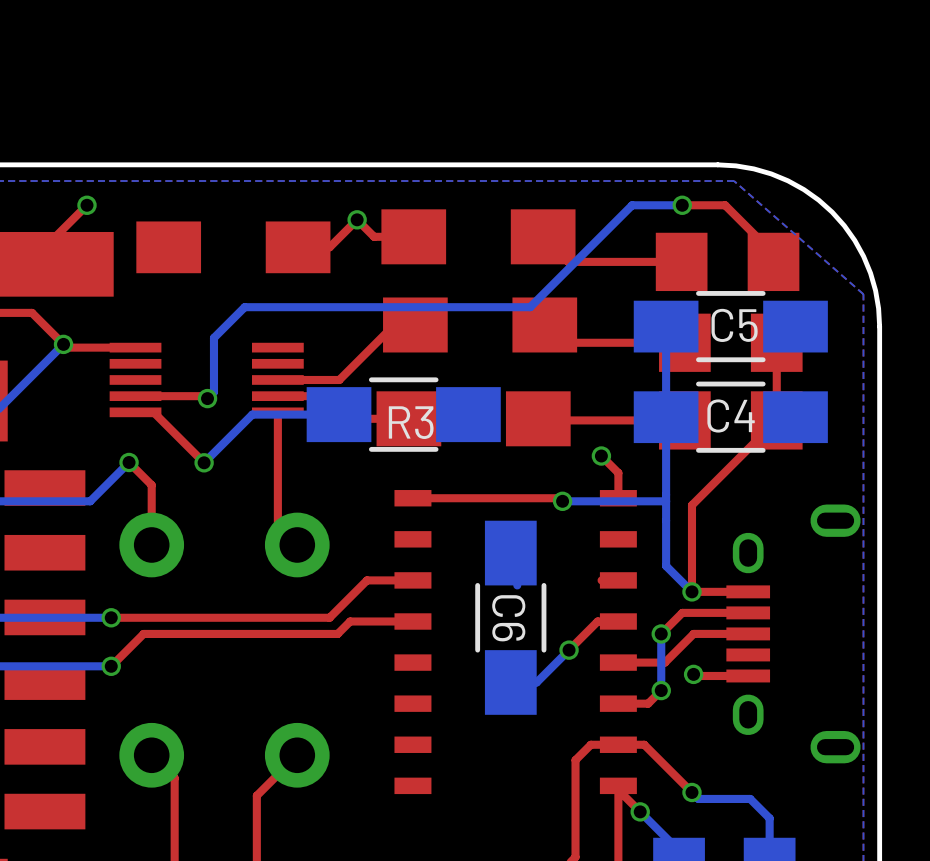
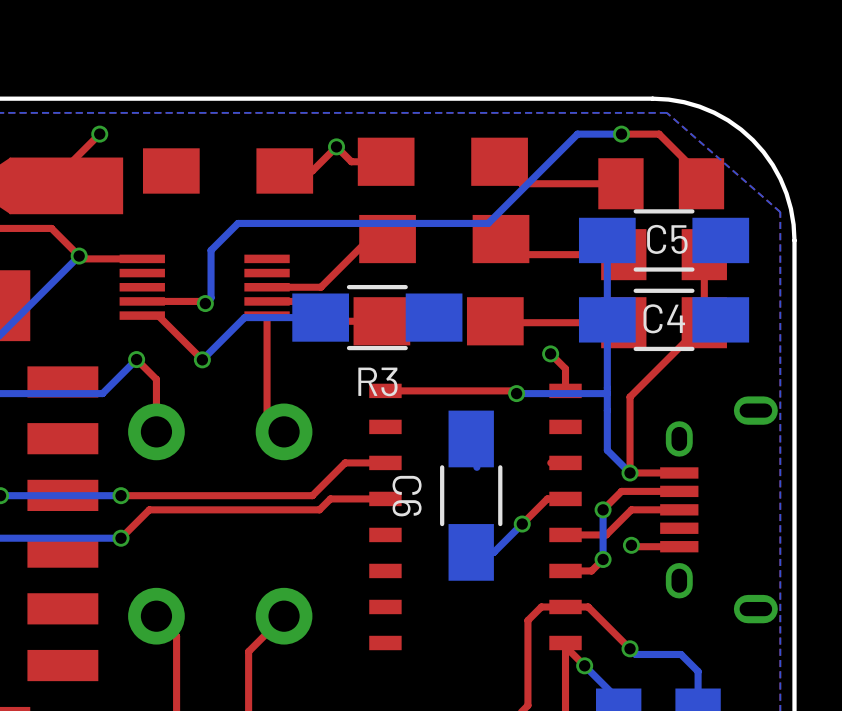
R3 name position: R3 (411, 422) -> R3 (377, 381)
C6 name position: C6 (508, 618) -> C6 (407, 496)

